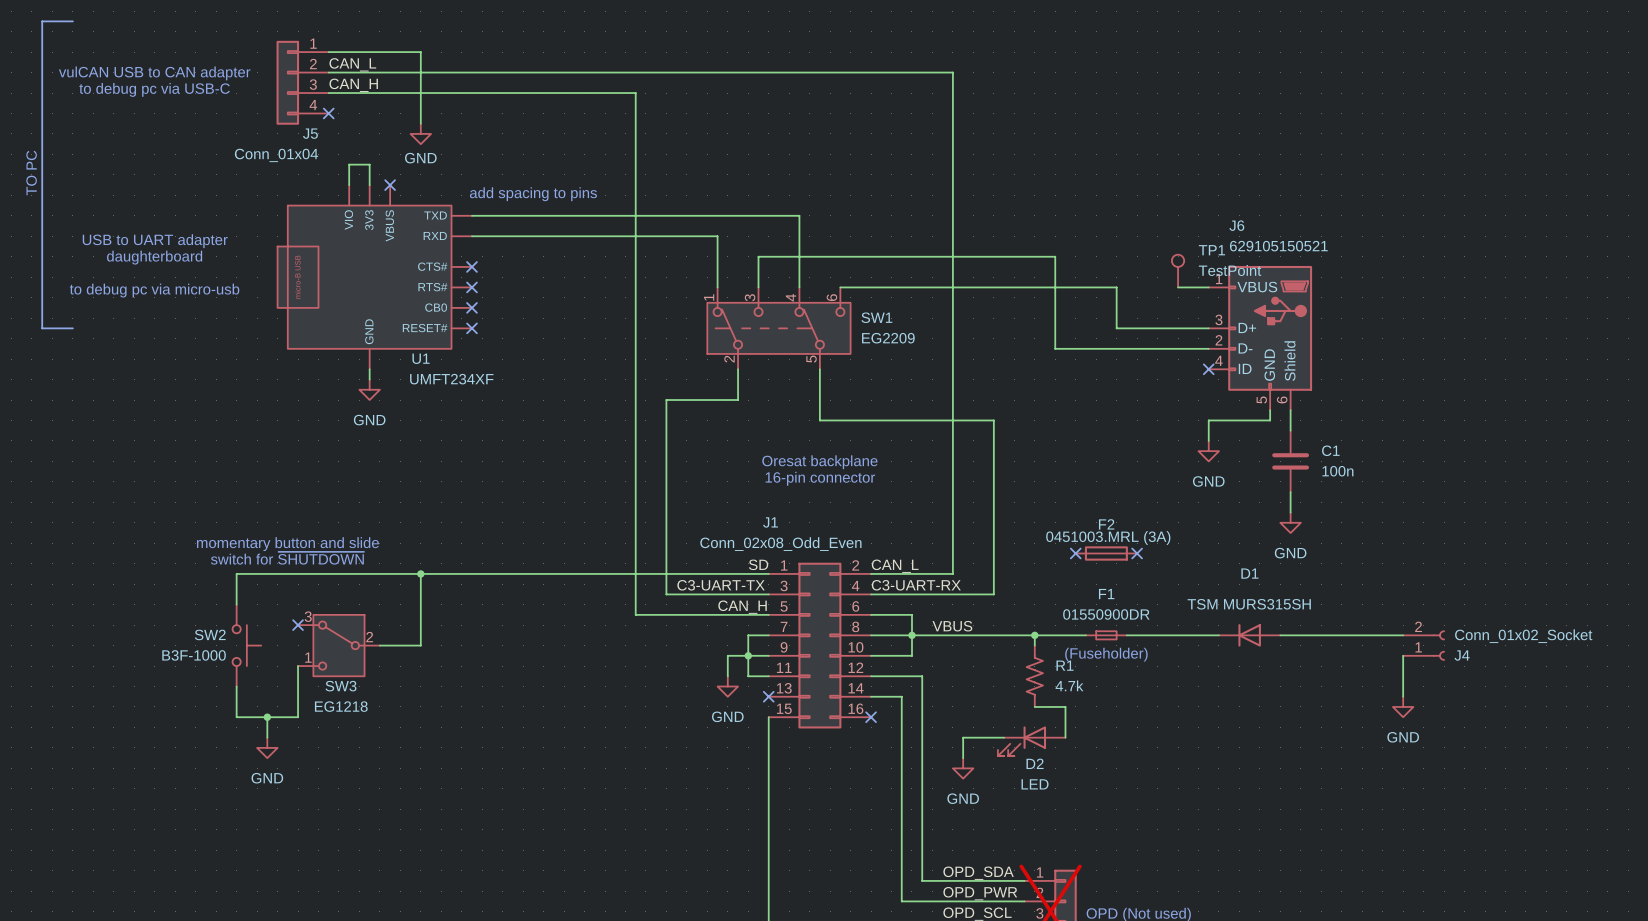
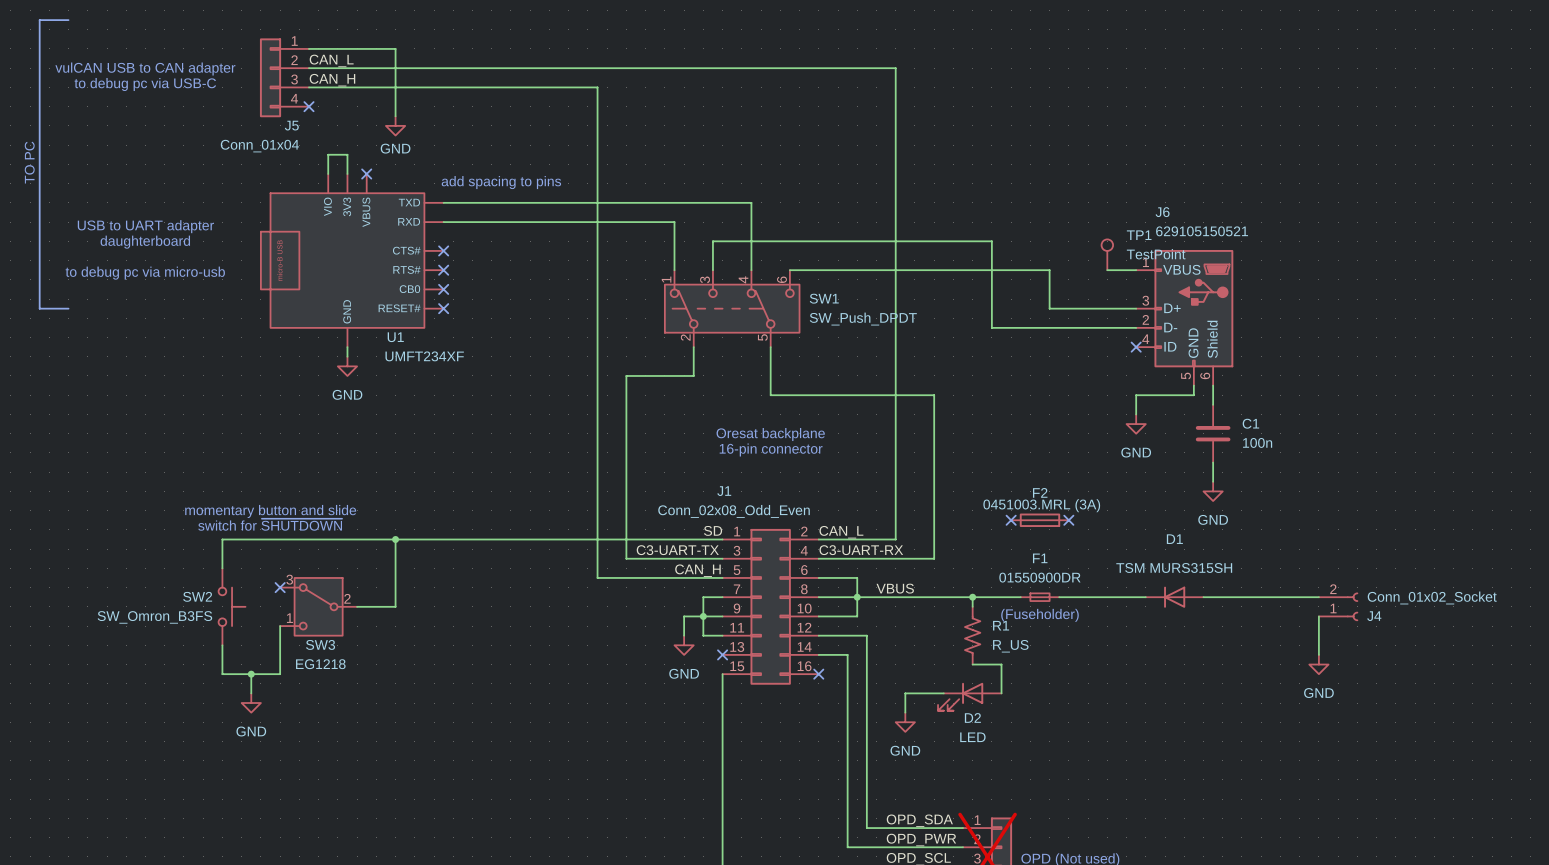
SW1 value: EG2209 (888, 338) -> SW_Push_DPDT (863, 319)
SW2 value: B3F-1000 (194, 655) -> SW_Omron_B3FS (154, 617)
R1 value: 4.7k (1069, 685) -> R_US (1010, 646)

